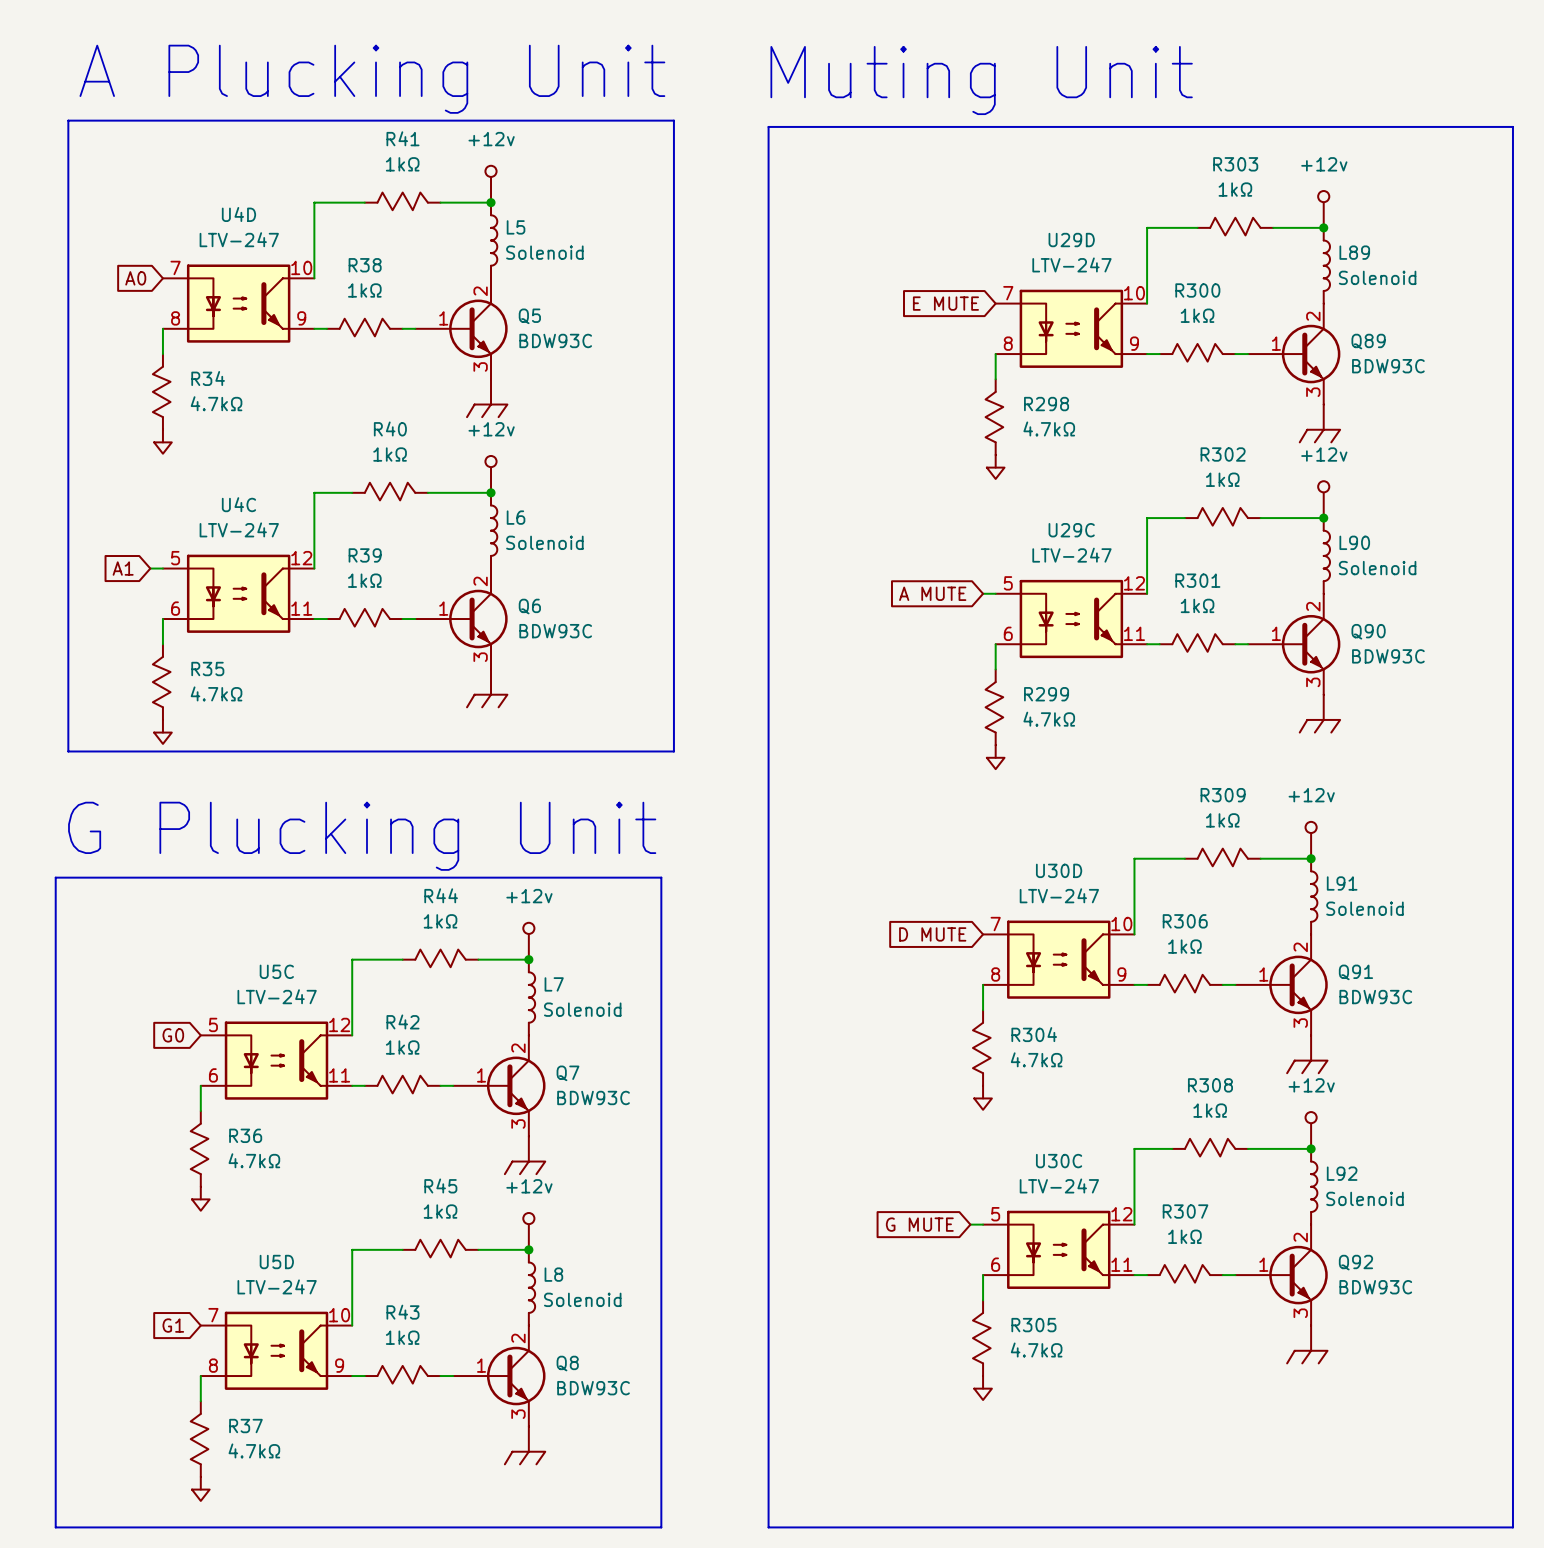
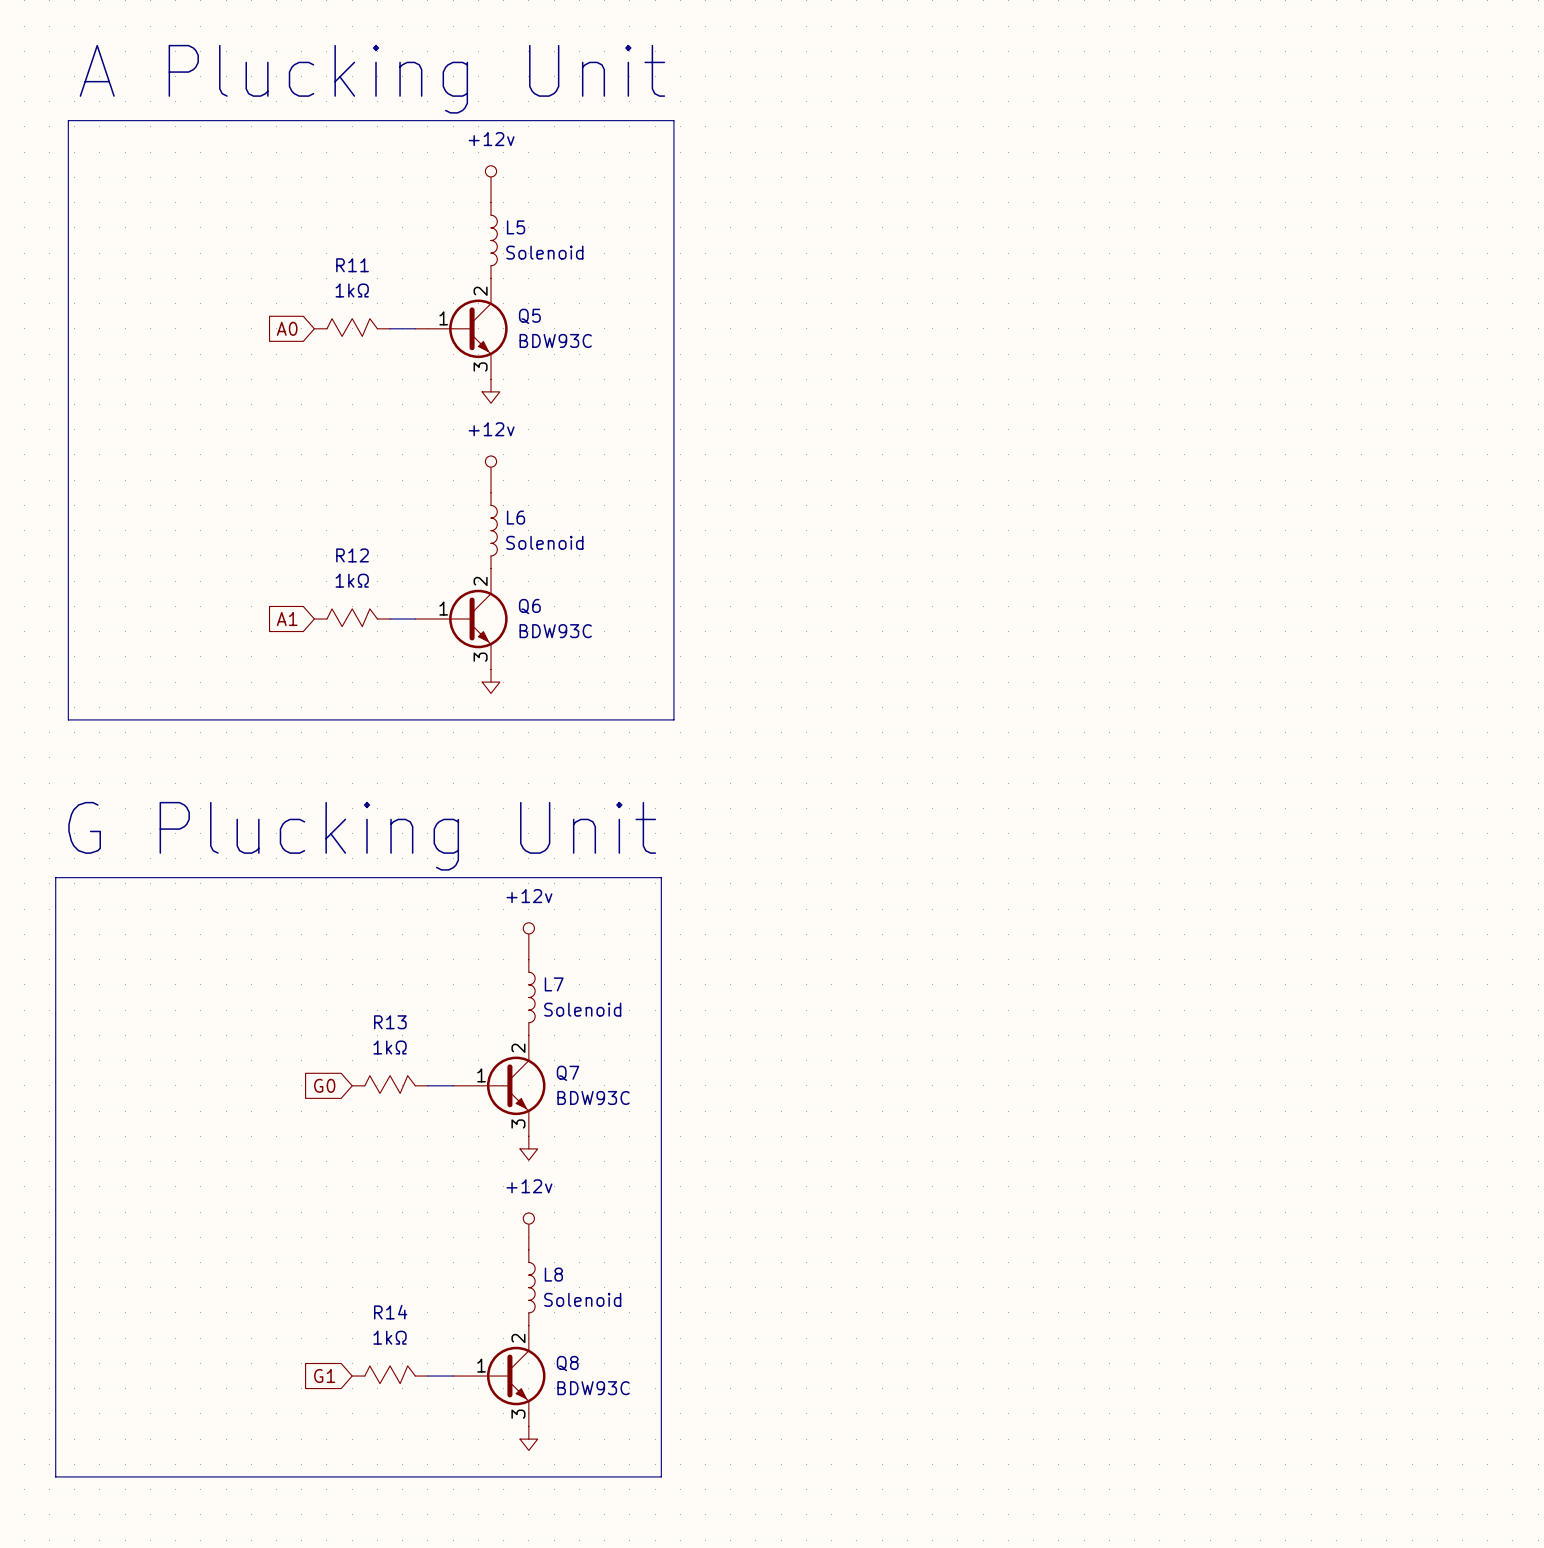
text: Muting Unit (981, 80) -> none
line: (768, 126) (1512, 126) (1512, 1527) (768, 1527) (768, 126) -> none
R41: 1kΩ (402, 201) -> none
wire: (364, 202) (314, 202) (314, 278) -> none
wire: (440, 202) (491, 202) -> none
junction: (491, 202) -> none
power symbol: +12v (1323, 209) -> none
R303: 1kΩ (1235, 226) -> none
wire: (1197, 227) (1147, 227) (1147, 303) -> none
wire: (1273, 227) (1323, 227) -> none
junction: (1323, 227) -> none
L89: Solenoid (1326, 265) -> none
global label position: A0 (135, 278) -> A0 (287, 328)
U4D: LTV-247 (238, 303) -> none
global label: E MUTE (945, 303) -> none
R11: none -> 1kΩ (352, 327)
R38: 1kΩ (364, 327) -> none
wire: (162, 328) (162, 354) -> none
U29D: LTV-247 (1071, 328) -> none
R300: 1kΩ (1197, 352) -> none
wire: (995, 354) (995, 379) -> none
wire: (1147, 354) (1159, 354) -> none
wire: (1235, 354) (1248, 354) -> none
Q89: BDW93C (1294, 354) -> none
power symbol shape: [467, 379, 508, 418] -> [482, 379, 500, 404]
R34: 4.7kΩ (161, 391) -> none
R298: 4.7kΩ (994, 417) -> none
power symbol: (1319, 423) -> none
power symbol: (162, 441) -> none
power symbol: (995, 466) -> none
R40: 1kΩ (390, 491) -> none
wire: (352, 492) (314, 492) (314, 568) -> none
wire: (427, 492) (491, 492) -> none
junction: (491, 492) -> none
power symbol: +12v (1323, 499) -> none
R302: 1kΩ (1222, 516) -> none
wire: (1184, 518) (1147, 518) (1147, 593) -> none
wire: (1260, 518) (1323, 518) -> none
junction: (1323, 518) -> none
L90: Solenoid (1326, 555) -> none
global label position: A1 (123, 568) -> A1 (287, 619)
wire: (150, 568) (162, 568) -> none
U4C: LTV-247 (238, 593) -> none
global label: A MUTE (932, 593) -> none
wire: (983, 593) (995, 593) -> none
R12: none -> 1kΩ (352, 617)
R39: 1kΩ (364, 617) -> none
wire: (162, 619) (162, 644) -> none
U29C: LTV-247 (1071, 619) -> none
R301: 1kΩ (1197, 642) -> none
wire: (995, 644) (995, 669) -> none
wire: (1147, 644) (1159, 644) -> none
wire: (1235, 644) (1248, 644) -> none
Q90: BDW93C (1294, 644) -> none
power symbol shape: [467, 669, 508, 708] -> [482, 669, 500, 694]
R35: 4.7kΩ (161, 682) -> none
R299: 4.7kΩ (994, 707) -> none
power symbol: (1319, 713) -> none
line: (68, 719) (68, 751) (673, 751) (673, 719) -> (68, 719) (673, 719)
power symbol: (162, 731) -> none
power symbol: (995, 757) -> none
power symbol: +12v (1311, 840) -> none
R309: 1kΩ (1222, 857) -> none
wire: (1184, 858) (1134, 858) (1134, 934) -> none
wire: (1260, 858) (1311, 858) -> none
junction: (1311, 858) -> none
L91: Solenoid (1314, 896) -> none
global label: D MUTE (932, 934) -> none
R44: 1kΩ (440, 958) -> none
wire: (402, 959) (352, 959) (352, 1035) -> none
wire: (478, 959) (528, 959) -> none
junction: (528, 959) -> none
U30D: LTV-247 (1058, 959) -> none
R306: 1kΩ (1184, 983) -> none
wire: (983, 984) (983, 1010) -> none
wire: (1134, 984) (1147, 984) -> none
wire: (1222, 984) (1235, 984) -> none
Q91: BDW93C (1281, 984) -> none
global label position: G0 (173, 1035) -> G0 (324, 1085)
R304: 4.7kΩ (981, 1047) -> none
power symbol: (1307, 1054) -> none
U5C: LTV-247 (276, 1060) -> none
R13: none -> 1kΩ (390, 1084)
R42: 1kΩ (402, 1084) -> none
wire: (200, 1085) (200, 1111) -> none
power symbol: (983, 1097) -> none
power symbol: +12v (1311, 1130) -> none
power symbol shape: [504, 1136, 546, 1175] -> [520, 1136, 538, 1161]
R308: 1kΩ (1210, 1147) -> none
R36: 4.7kΩ (199, 1148) -> none
wire: (1172, 1148) (1134, 1148) (1134, 1224) -> none
wire: (1248, 1148) (1311, 1148) -> none
junction: (1311, 1148) -> none
L92: Solenoid (1314, 1186) -> none
power symbol: (200, 1198) -> none
global label: G MUTE (919, 1224) -> none
wire: (970, 1224) (983, 1224) -> none
R45: 1kΩ (440, 1248) -> none
wire: (402, 1249) (352, 1249) (352, 1325) -> none
wire: (478, 1249) (528, 1249) -> none
junction: (528, 1249) -> none
U30C: LTV-247 (1058, 1249) -> none
R307: 1kΩ (1184, 1273) -> none
wire: (983, 1275) (983, 1300) -> none
wire: (1134, 1275) (1147, 1275) -> none
wire: (1222, 1275) (1235, 1275) -> none
Q92: BDW93C (1281, 1275) -> none
global label position: G1 (173, 1325) -> G1 (324, 1376)
R305: 4.7kΩ (981, 1338) -> none
power symbol: (1307, 1344) -> none
U5D: LTV-247 (276, 1350) -> none
R14: none -> 1kΩ (390, 1374)
R43: 1kΩ (402, 1374) -> none
wire: (200, 1376) (200, 1401) -> none
power symbol: (983, 1388) -> none
power symbol shape: [504, 1426, 546, 1465] -> [520, 1426, 538, 1451]
R37: 4.7kΩ (199, 1439) -> none
line: (55, 1476) (55, 1527) (661, 1527) (661, 1476) -> (55, 1476) (661, 1476)
power symbol: (200, 1488) -> none

